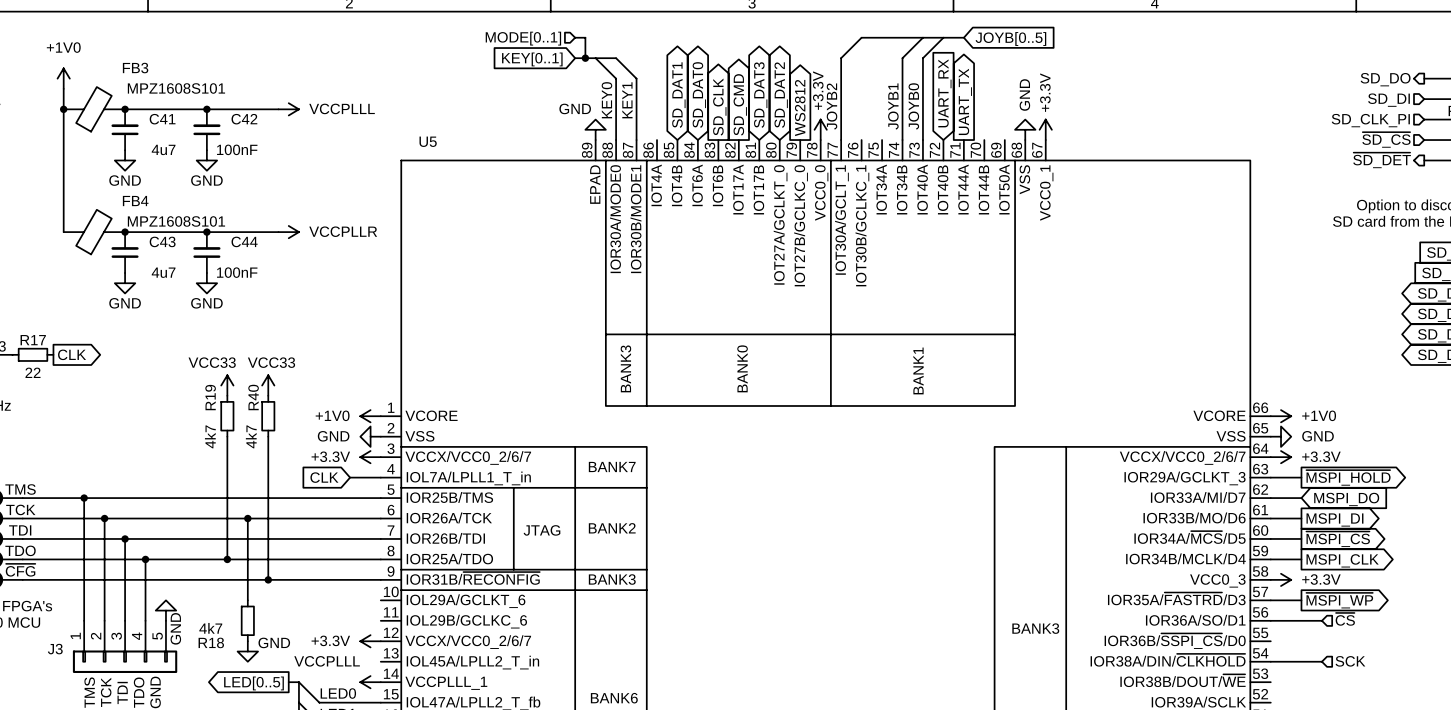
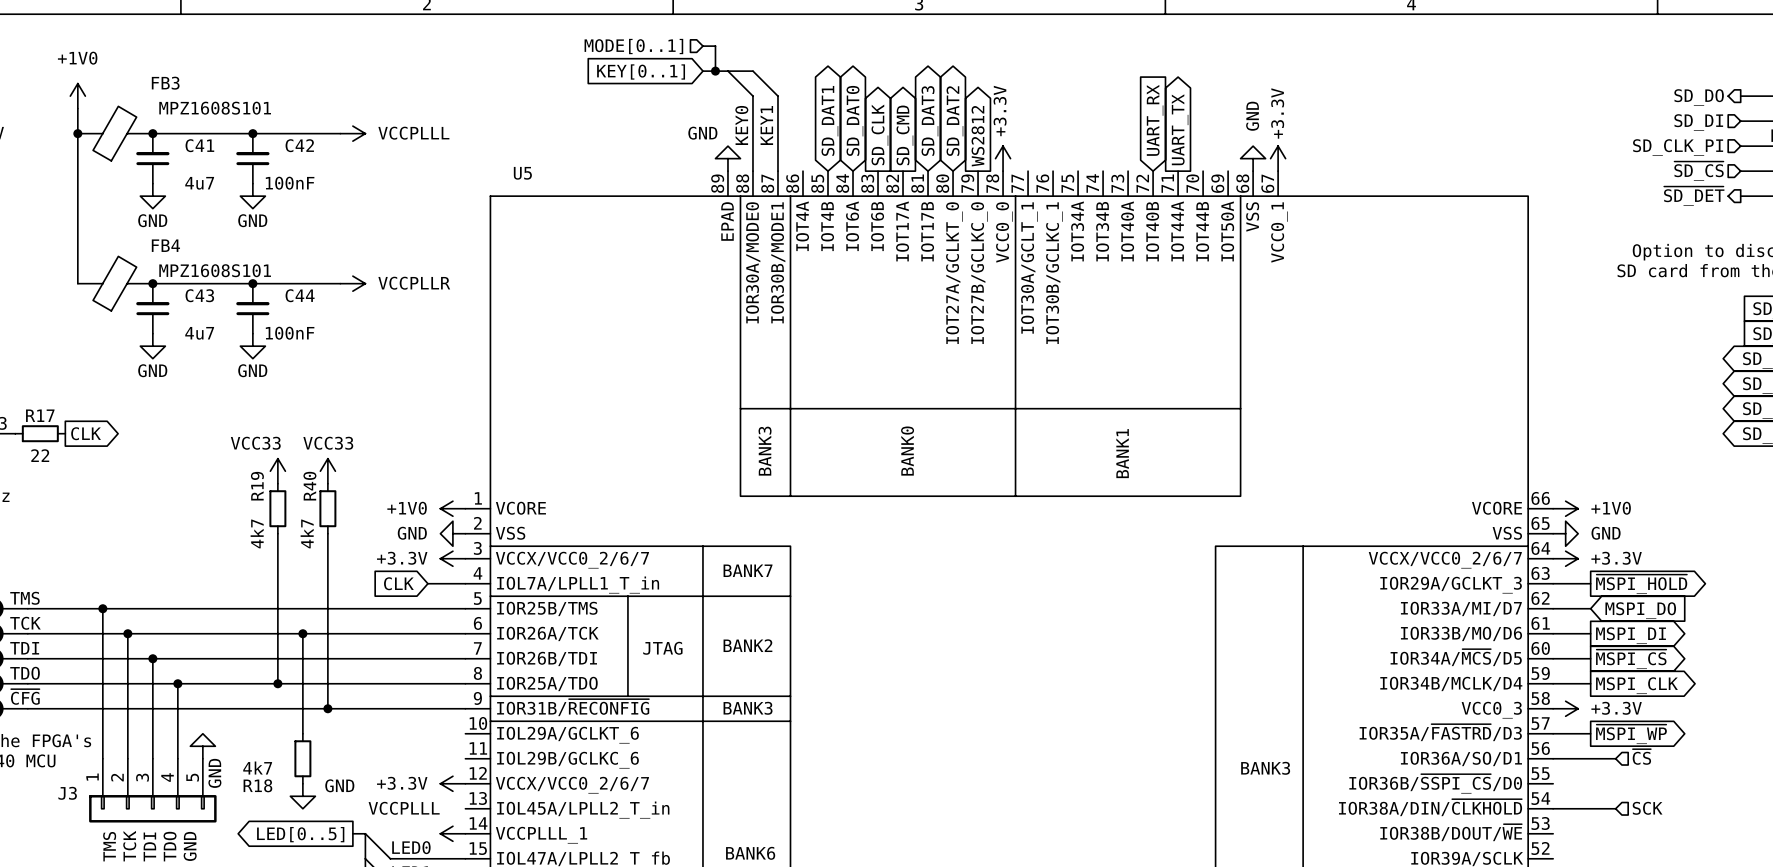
wire: (861, 37) (841, 58) (841, 140) -> none
bus: (861, 37) (963, 37) -> none
wire: (922, 37) (902, 58) (902, 140) -> none
wire: (943, 37) (922, 58) (922, 140) -> none
global label: JOYB[0..5] (1010, 39) -> none
label: JOYB2 (832, 106) -> none
label: JOYB1 (893, 106) -> none
label: JOYB0 (913, 106) -> none

